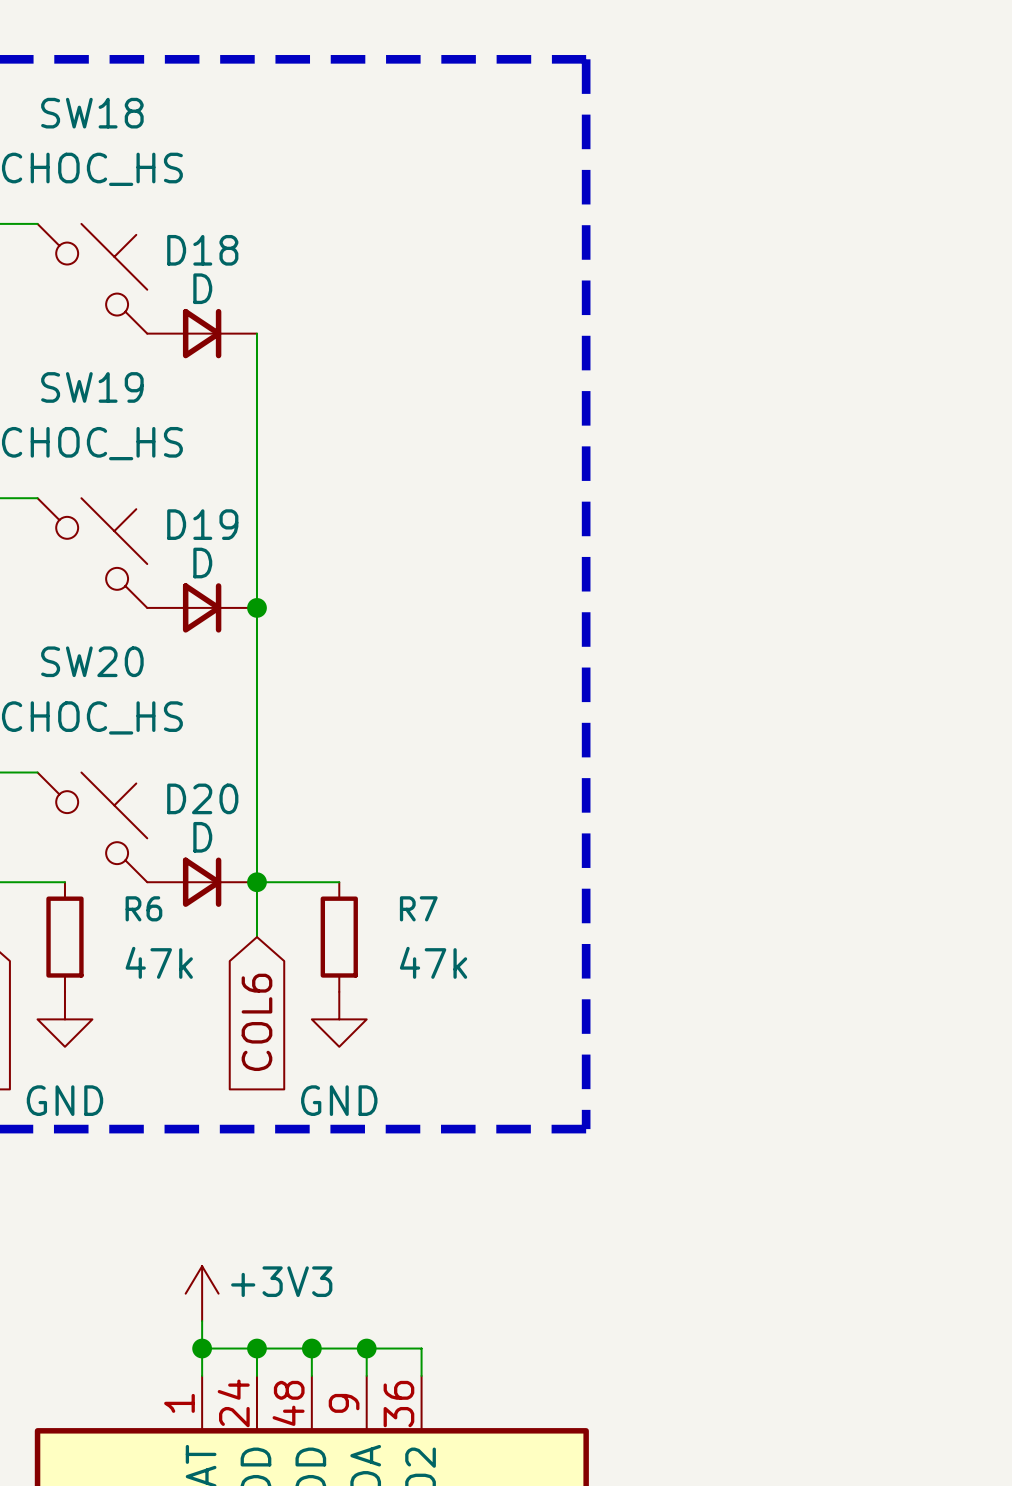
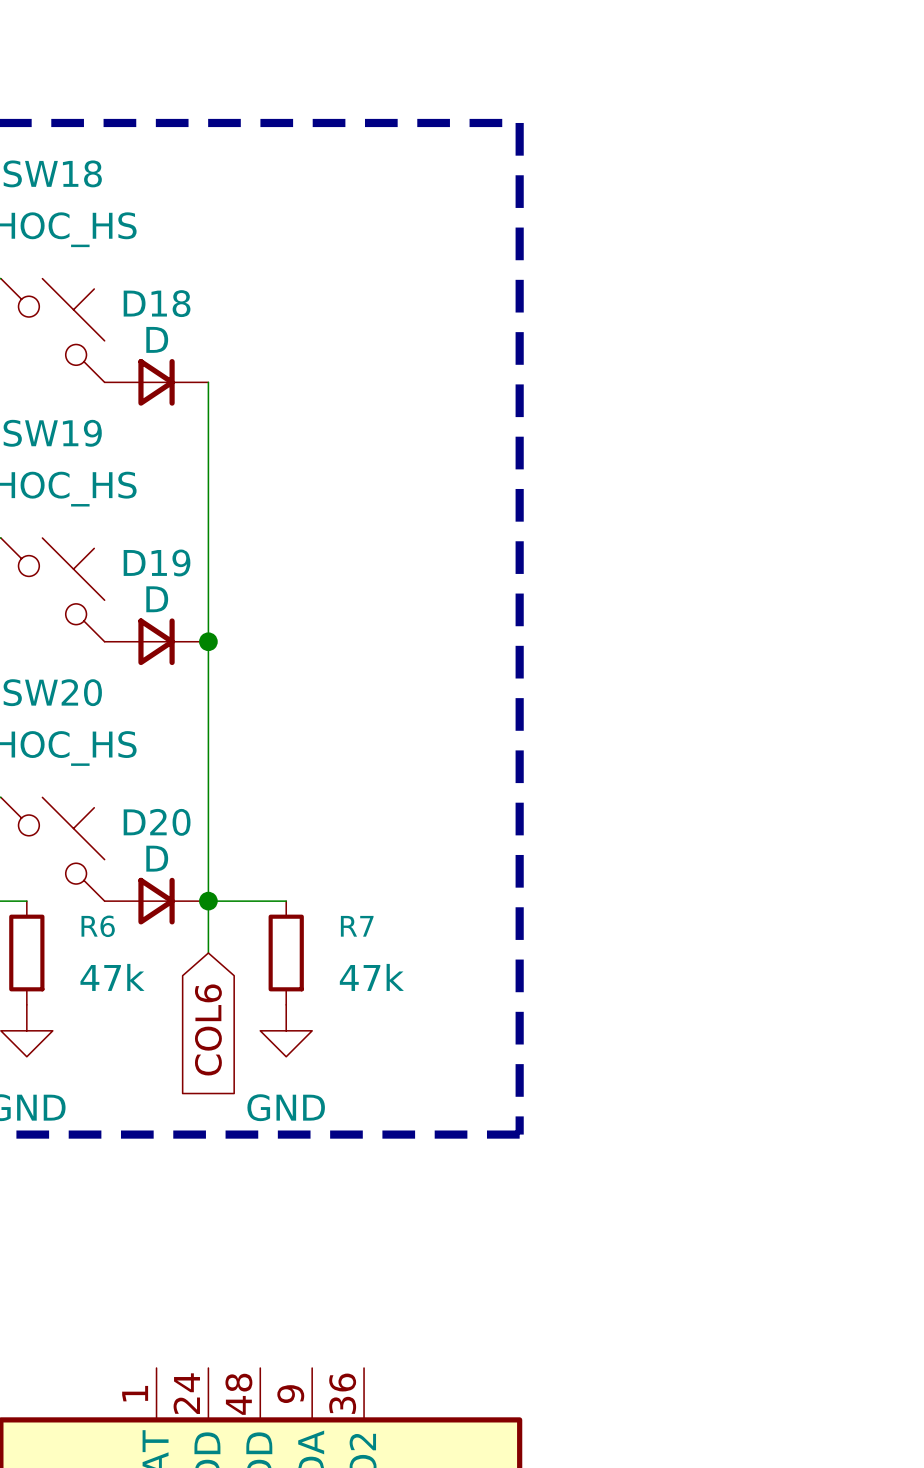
power symbol: +3V3 (202, 1293) -> none
wire: (202, 1321) (202, 1375) -> none
wire: (202, 1348) (421, 1348) (421, 1375) -> none
junction: (202, 1348) -> none
wire: (256, 1348) (256, 1375) -> none
junction: (256, 1348) -> none
wire: (311, 1348) (311, 1375) -> none
junction: (311, 1348) -> none
wire: (366, 1348) (366, 1375) -> none
junction: (366, 1348) -> none

